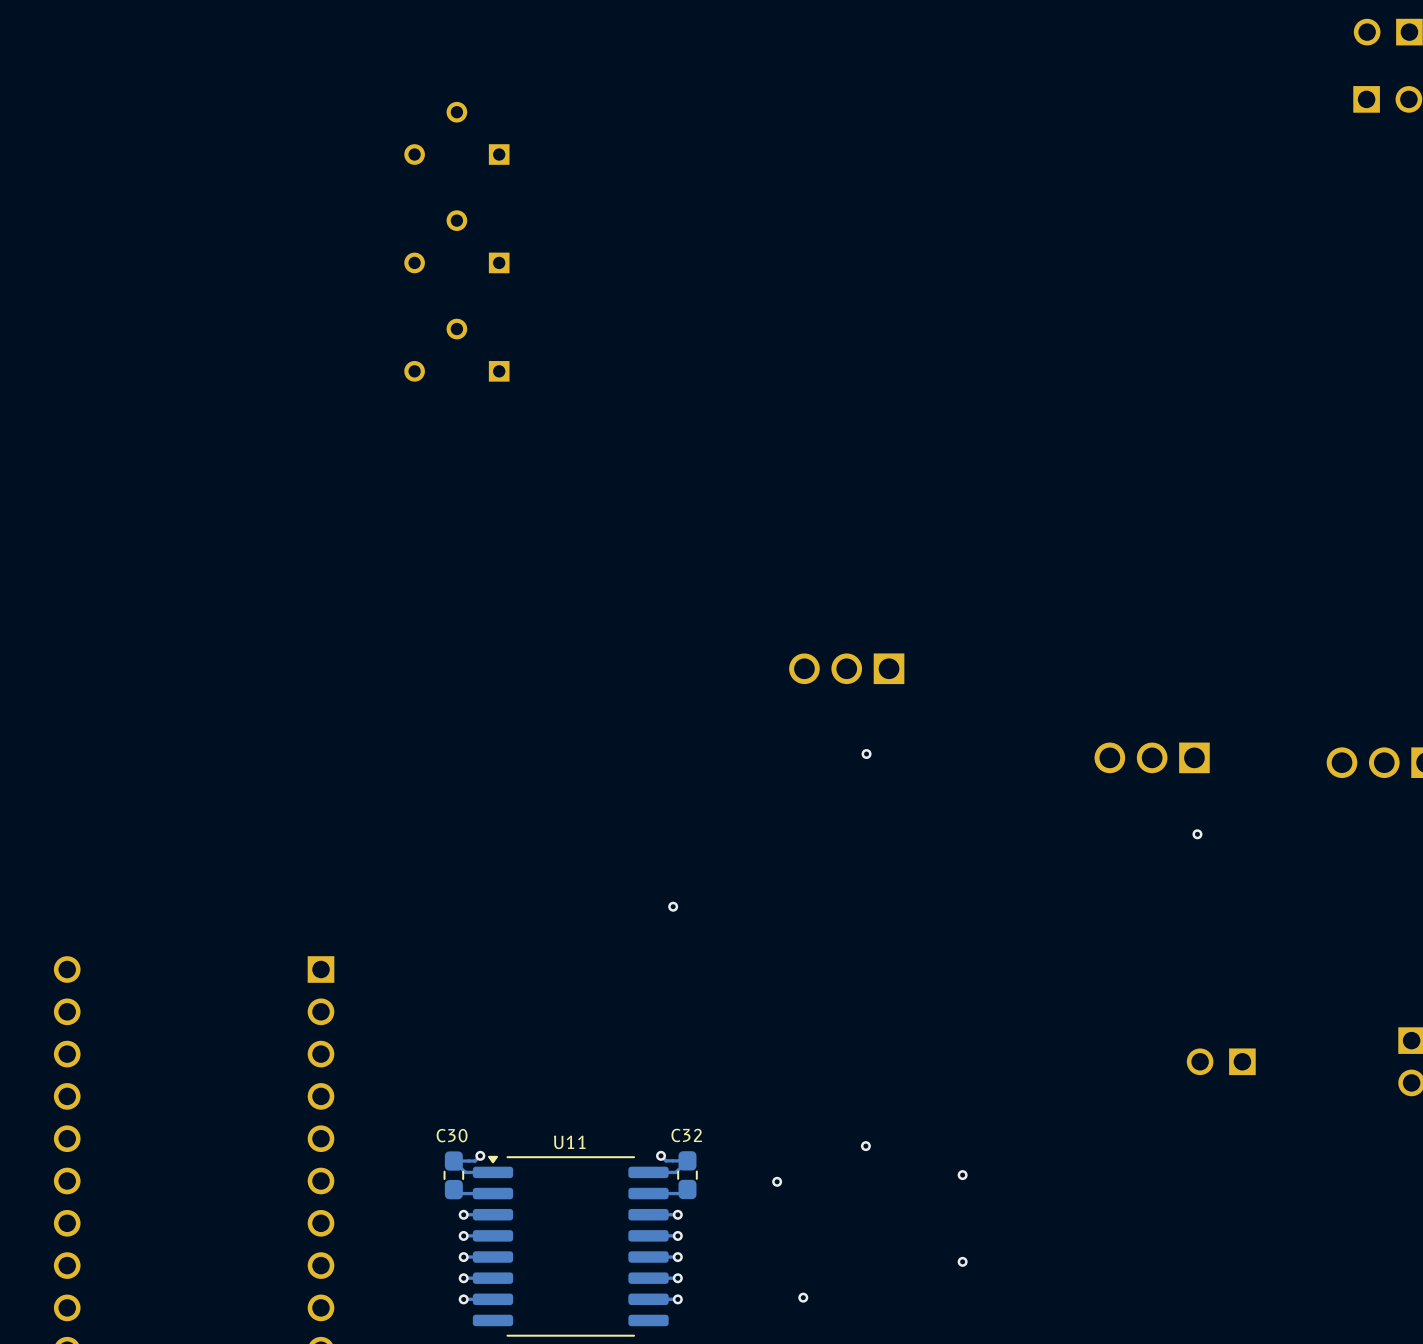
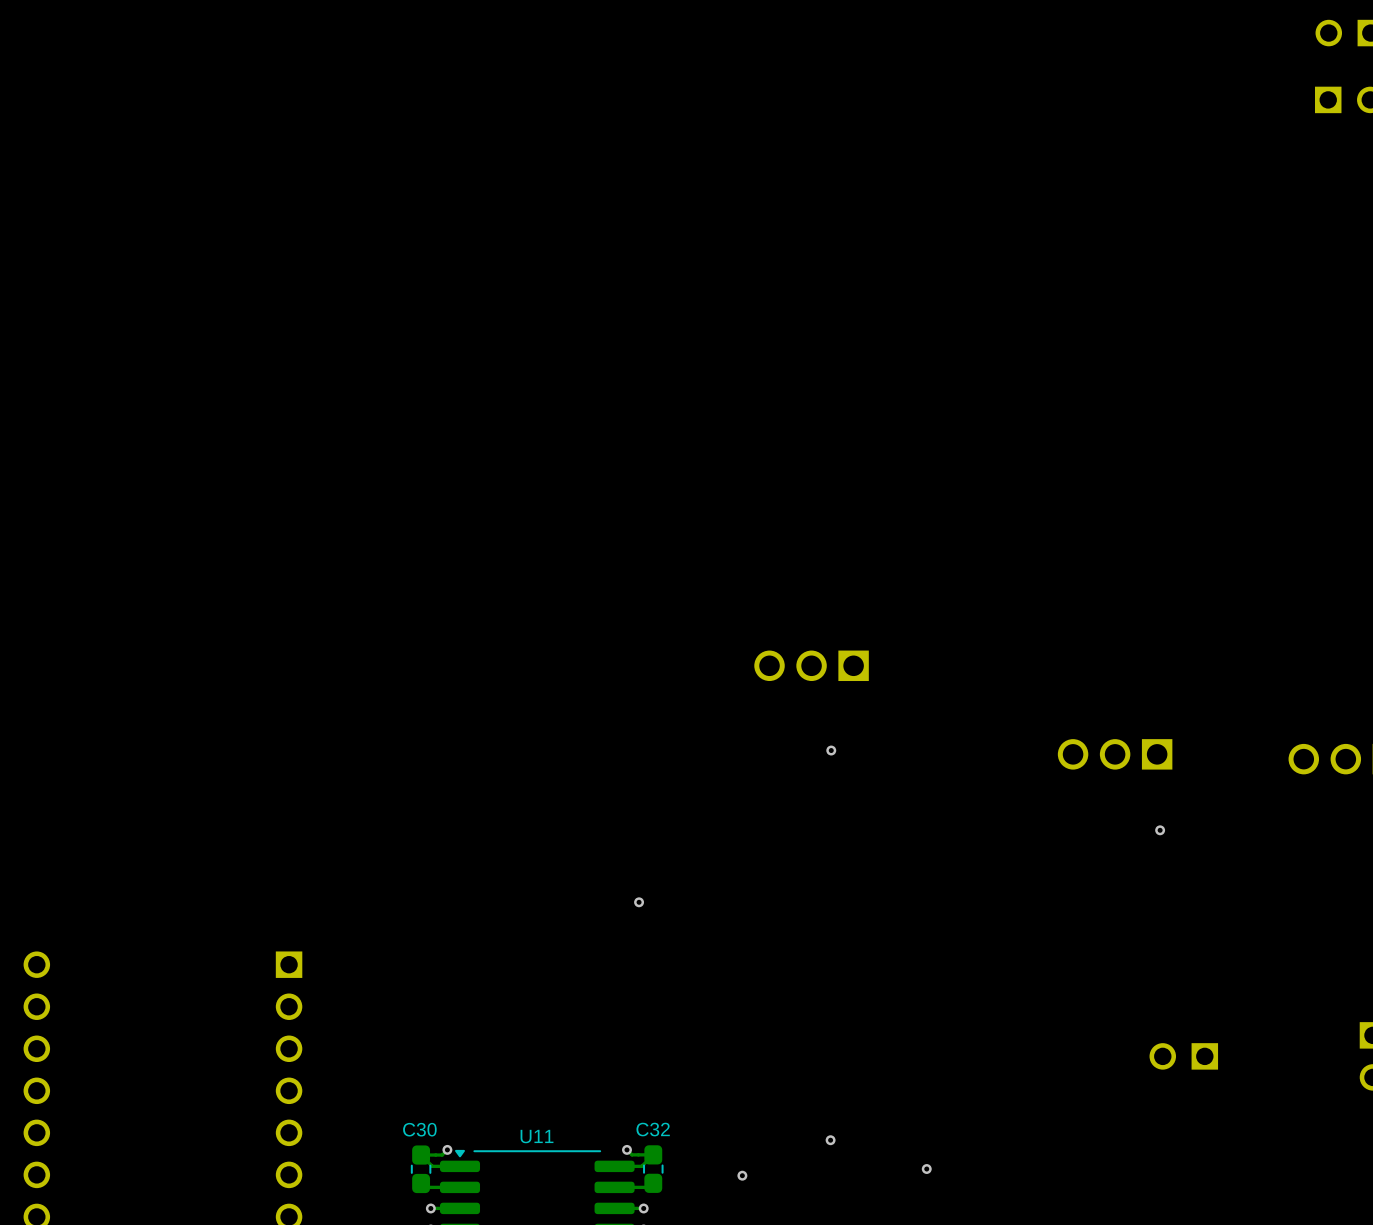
part: (456, 133) -> none
part: (456, 241) -> none
part: (456, 350) -> none

